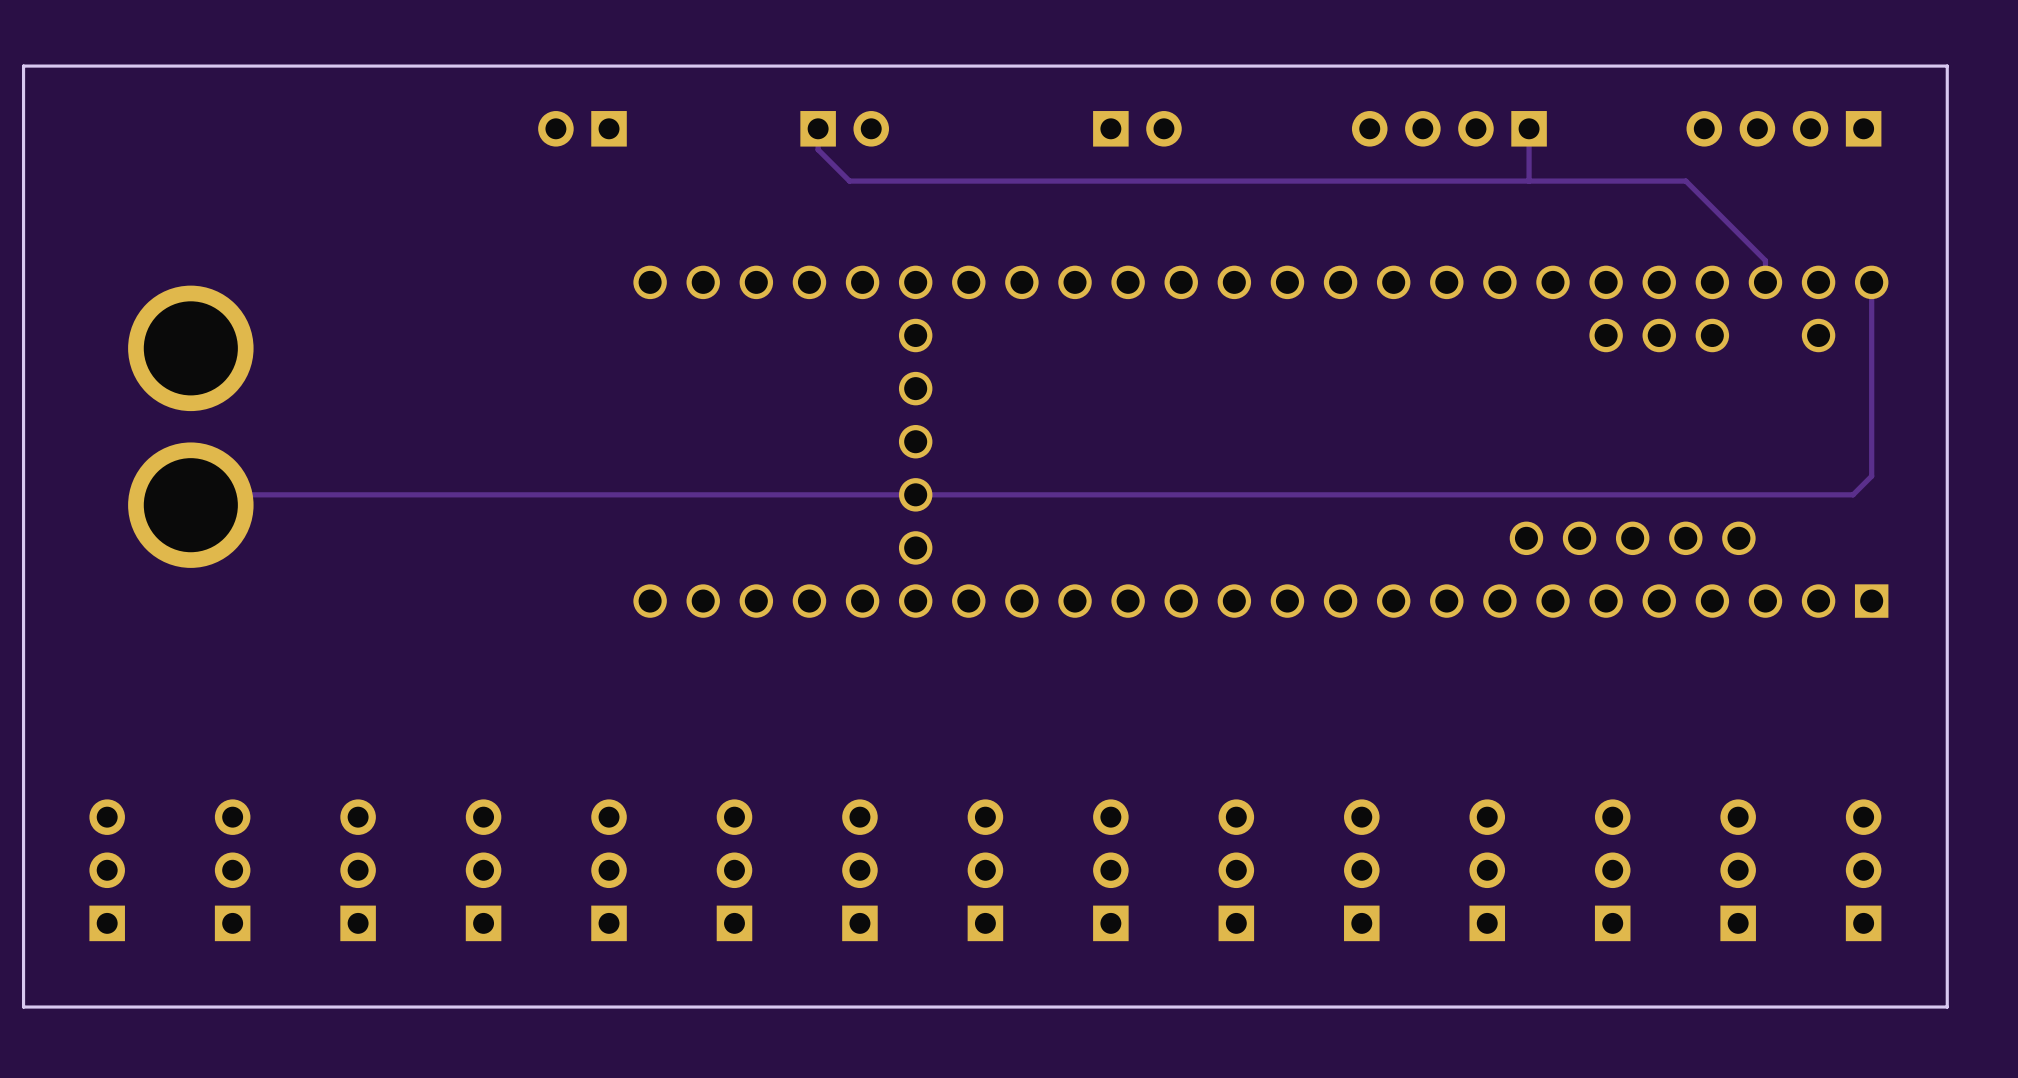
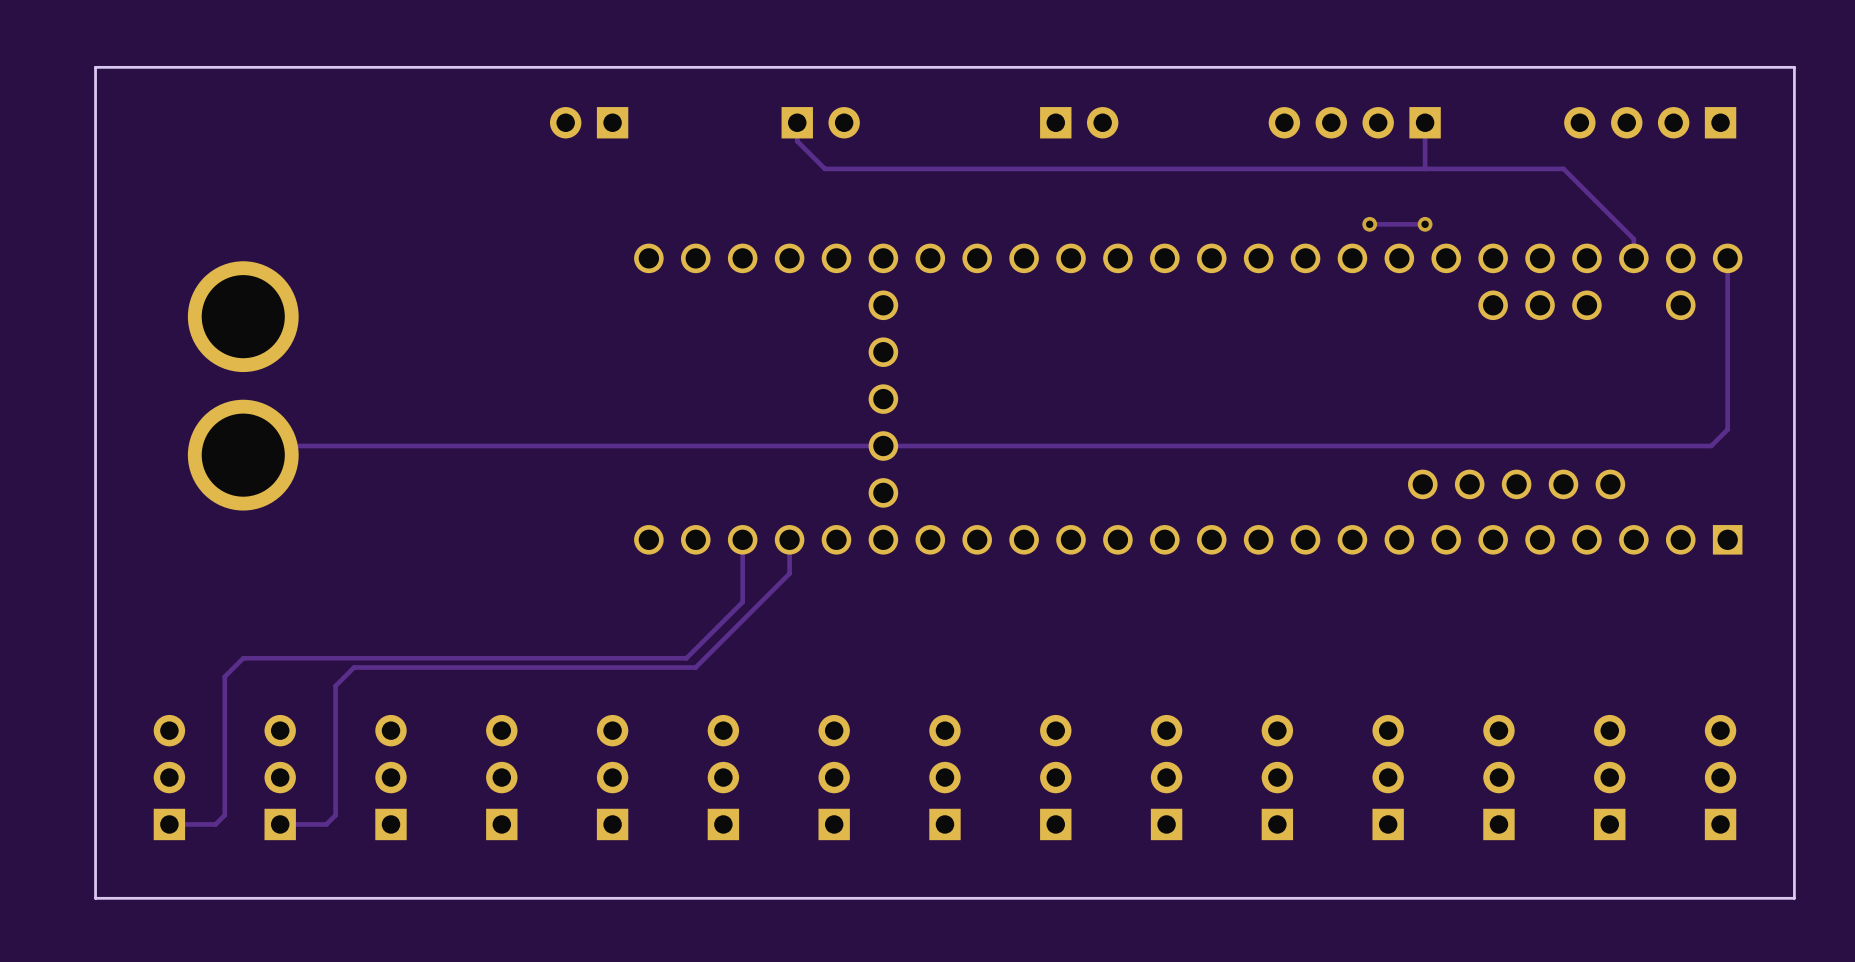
via: none -> (1369, 224)
track: none -> (1425, 224) (1369, 224)
via: none -> (1425, 224)
track: none -> (742, 539) (742, 602) (686, 658) (243, 658) (224, 676) (224, 815) (215, 824) (169, 824)
track: none -> (789, 539) (789, 573) (695, 667) (354, 667) (335, 685) (335, 815) (326, 824) (280, 824)

